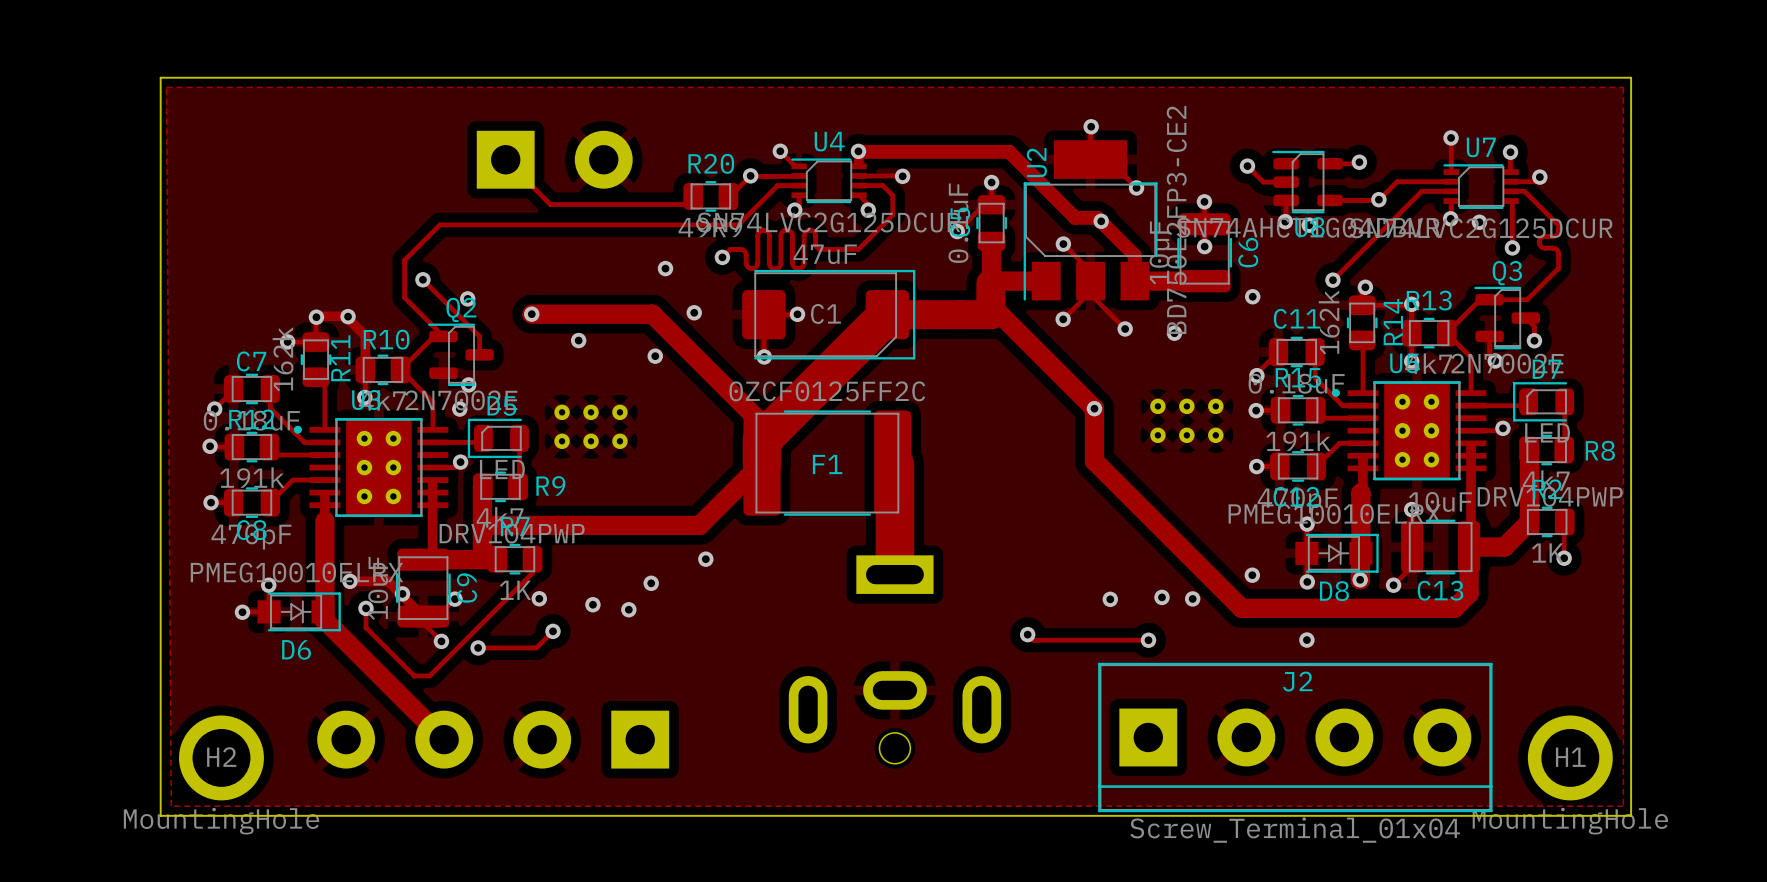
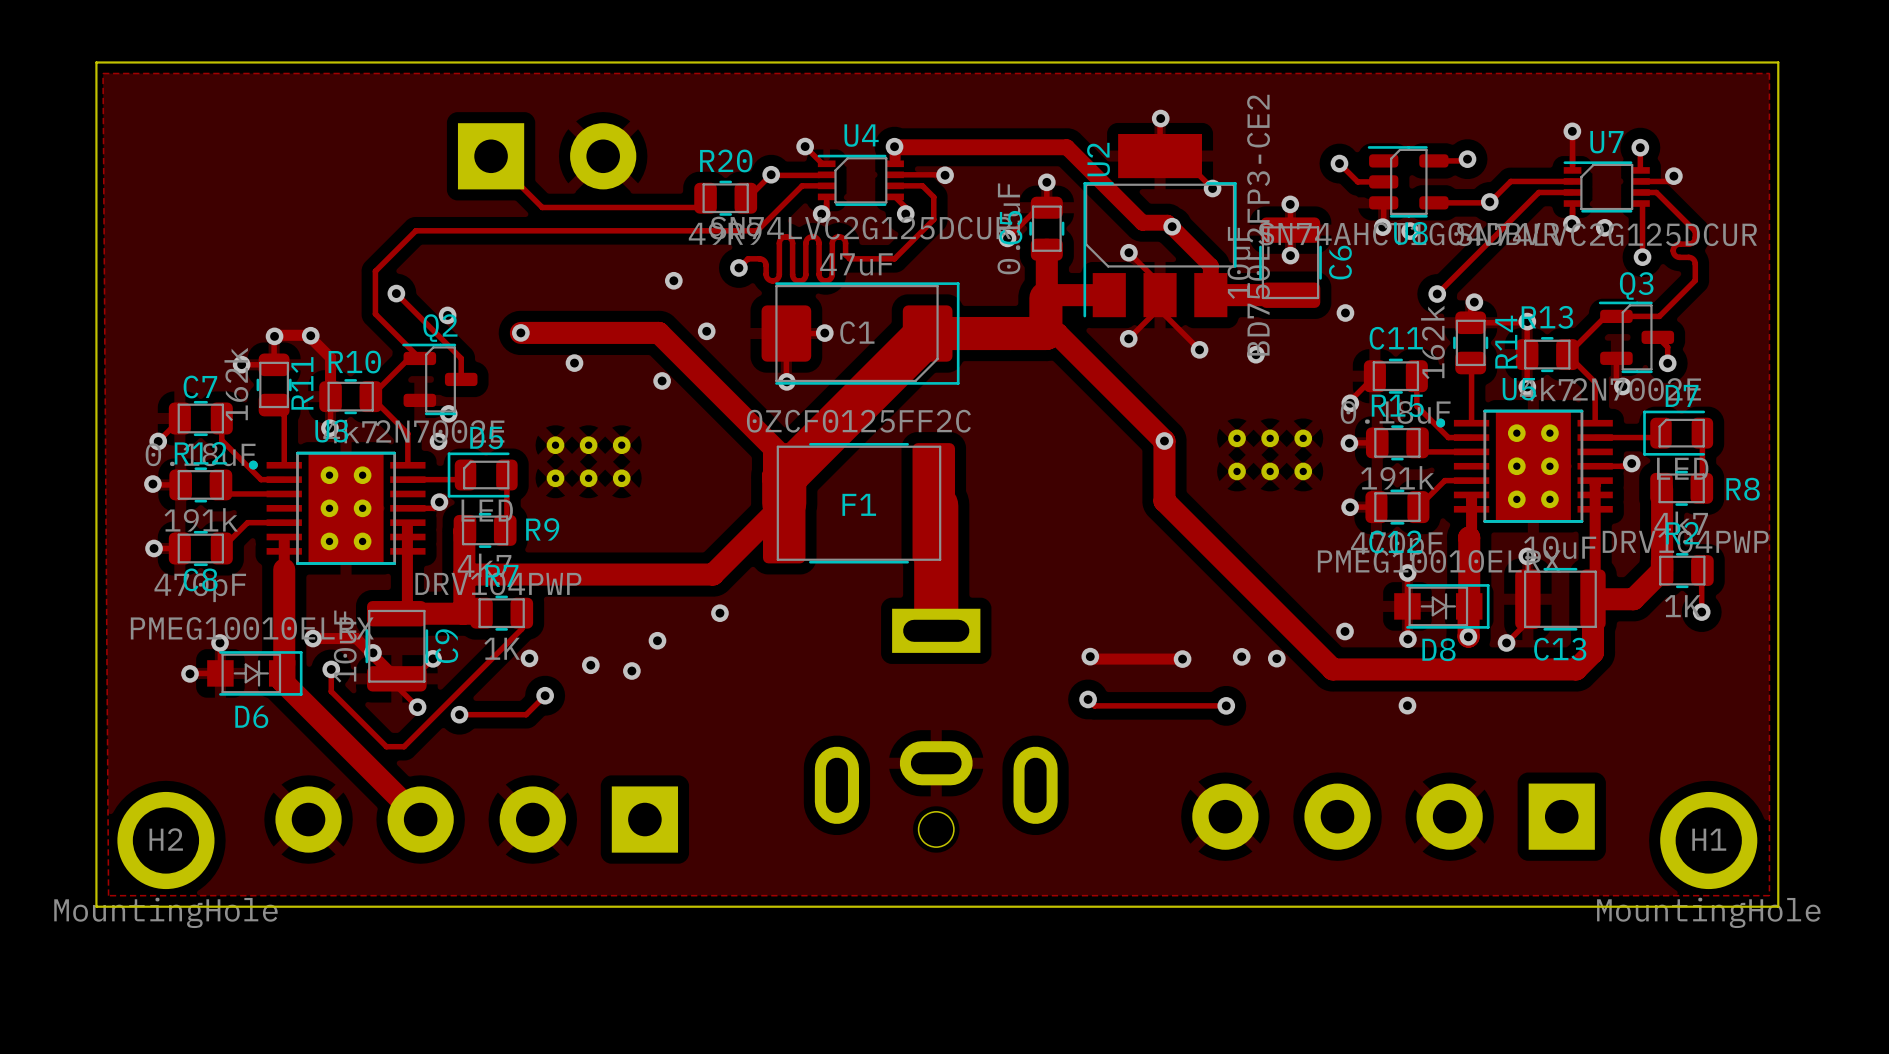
track: none -> (1090, 656) (1092, 659) (1182, 659)
via: none -> (1090, 656)
J2 side: top (1295, 737) -> bottom (1393, 816)

